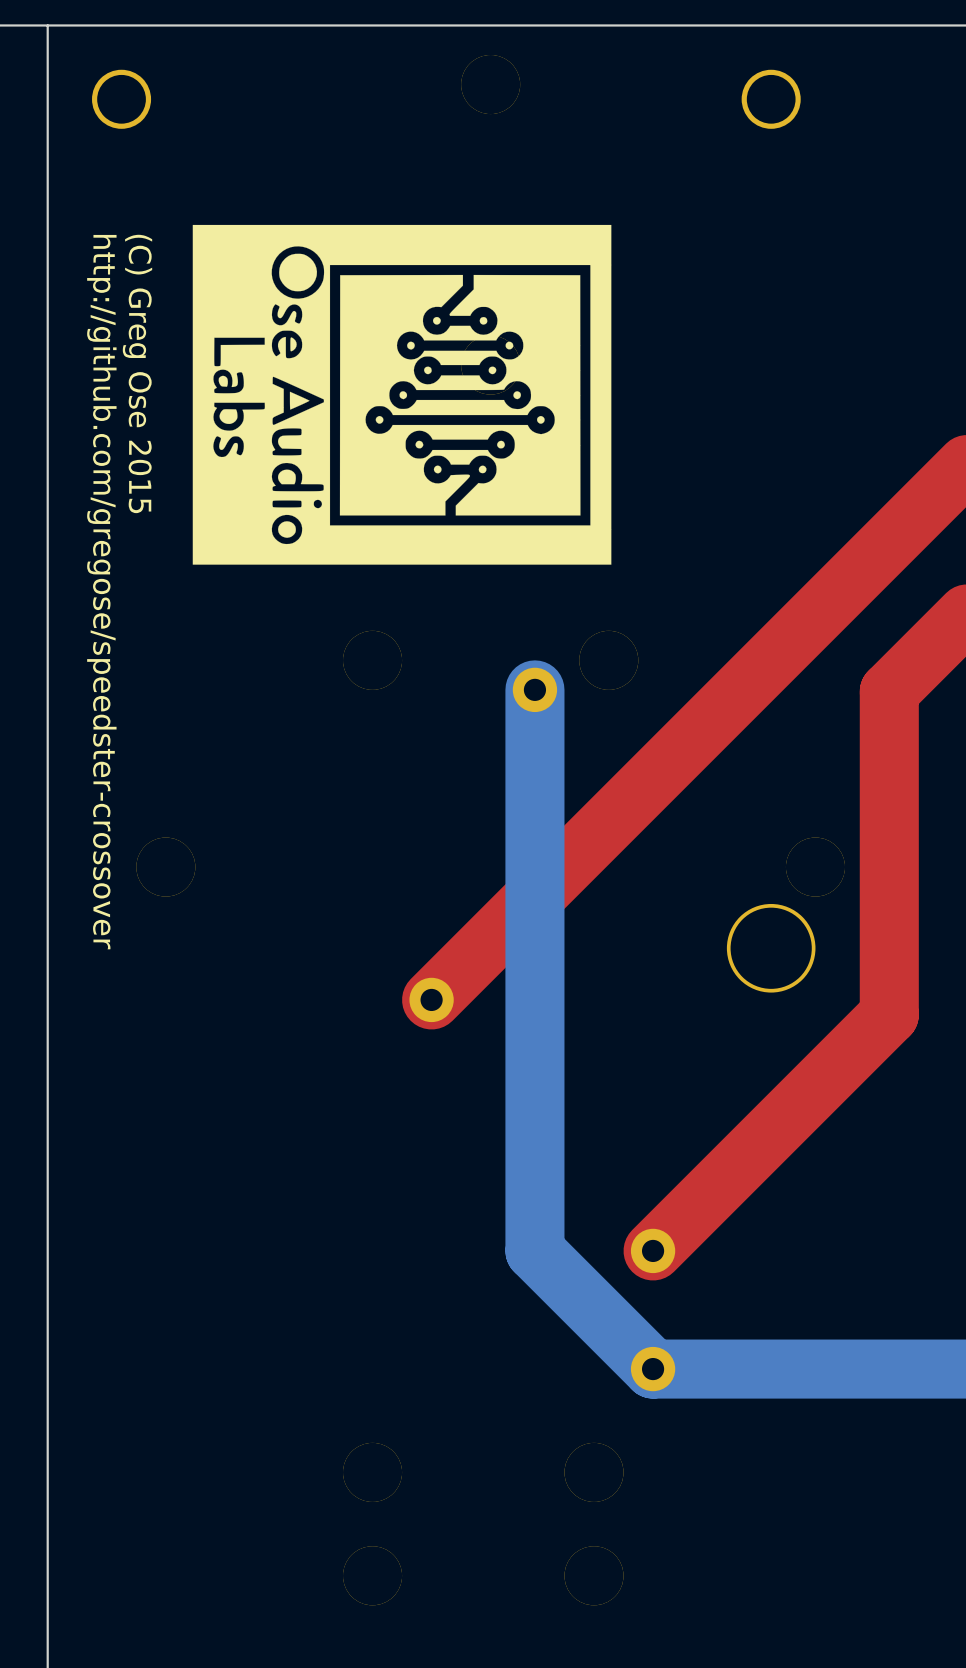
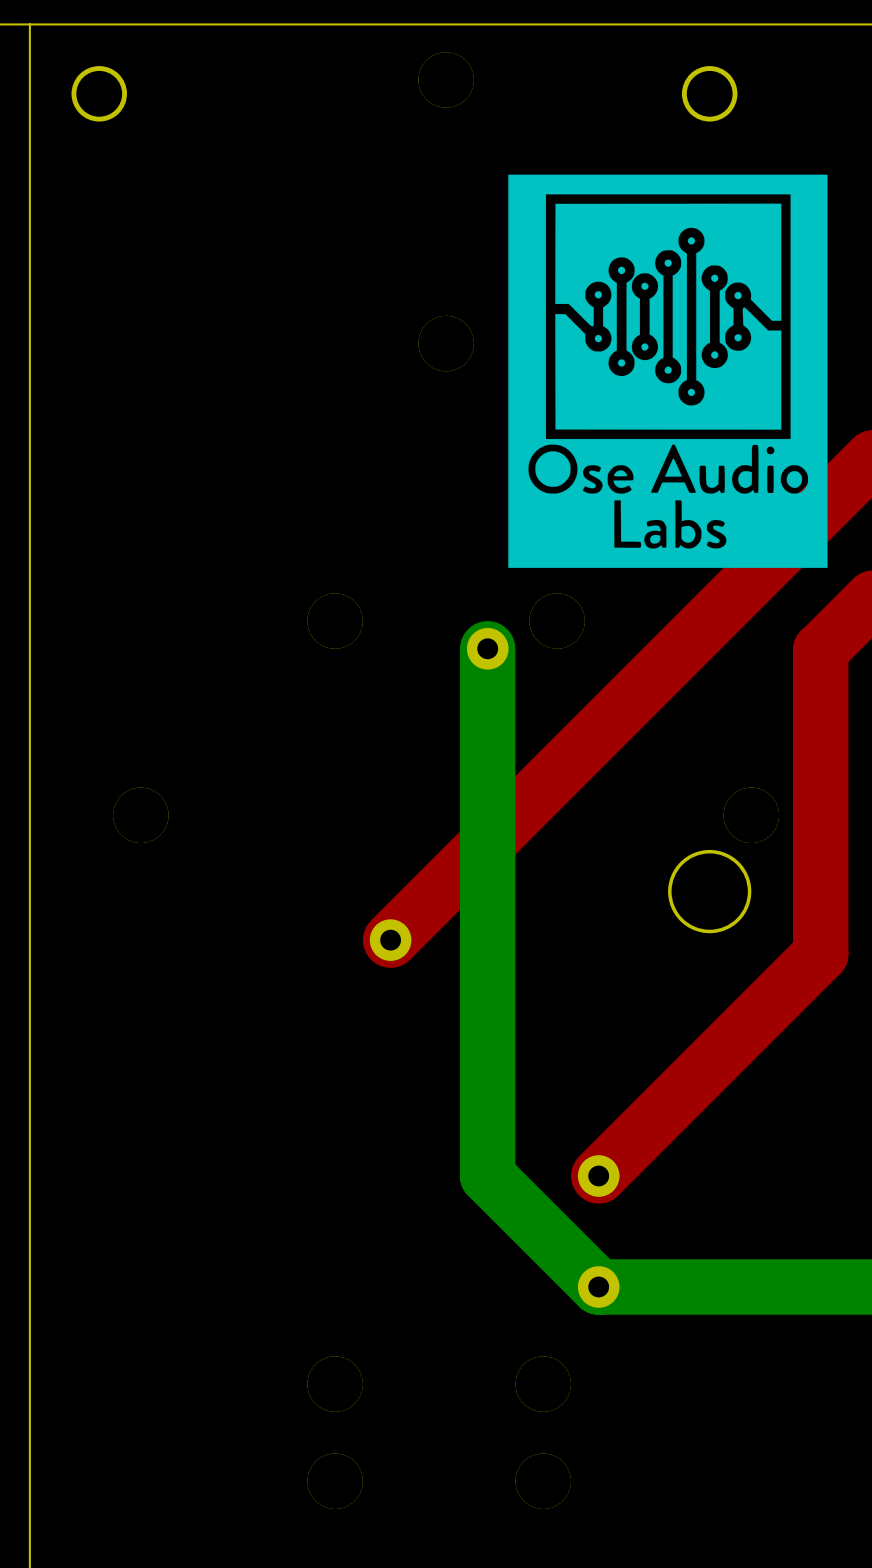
drawing: none -> [508, 174, 828, 568]
drawing: [192, 224, 612, 565] -> none
text: (C) Greg Ose 2015 (137, 373) -> none
text: http://github.com/gregose/speedster-crossover (101, 592) -> none

